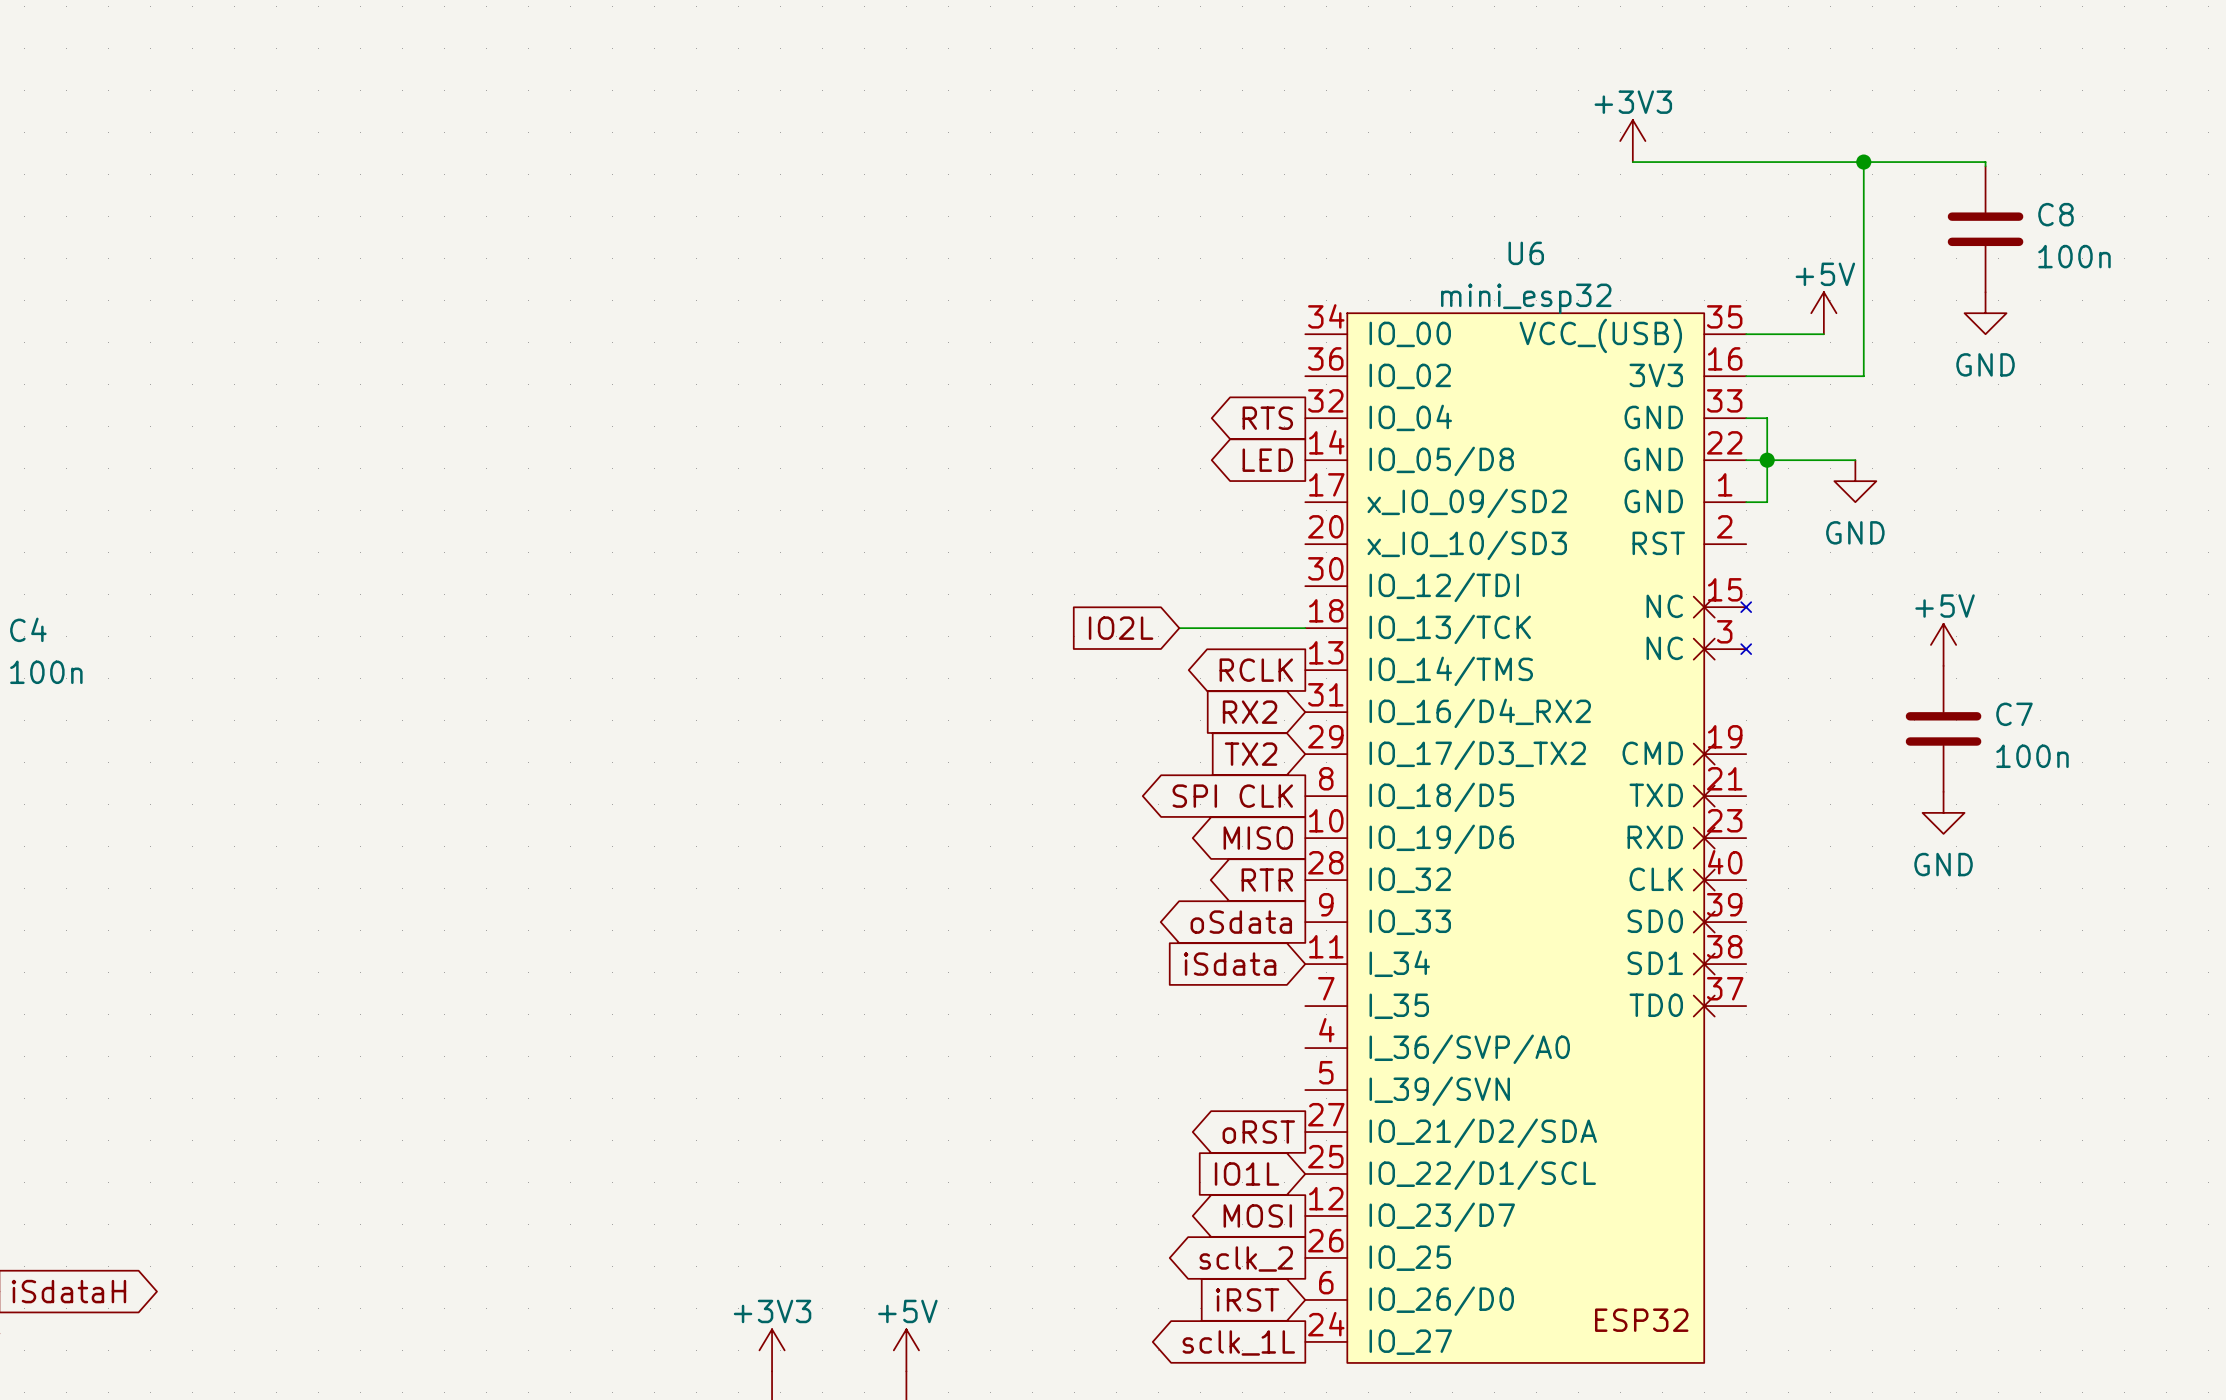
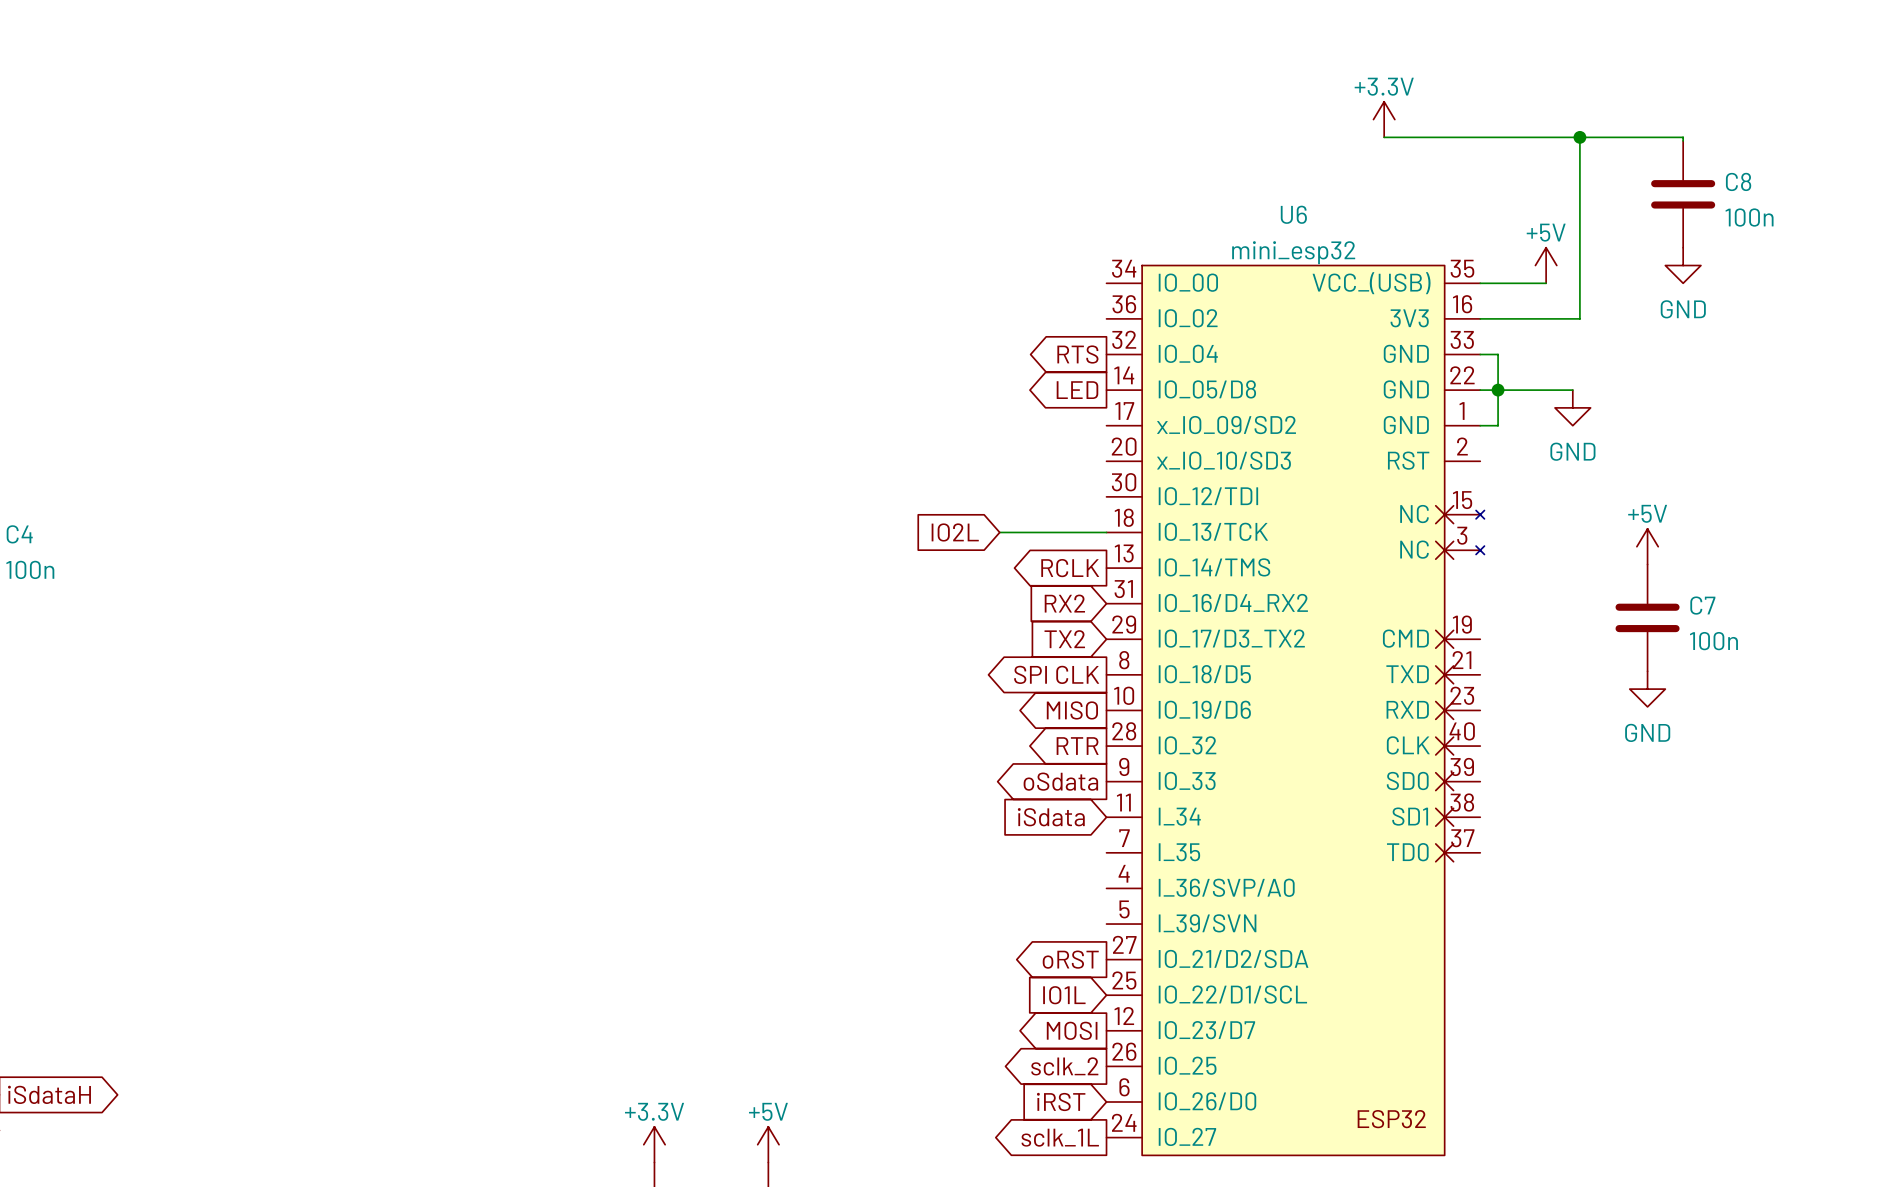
power symbol: +3V3 (1632, 141) -> +3.3V (1384, 119)
power symbol: +3V3 (772, 1350) -> +3.3V (654, 1144)

